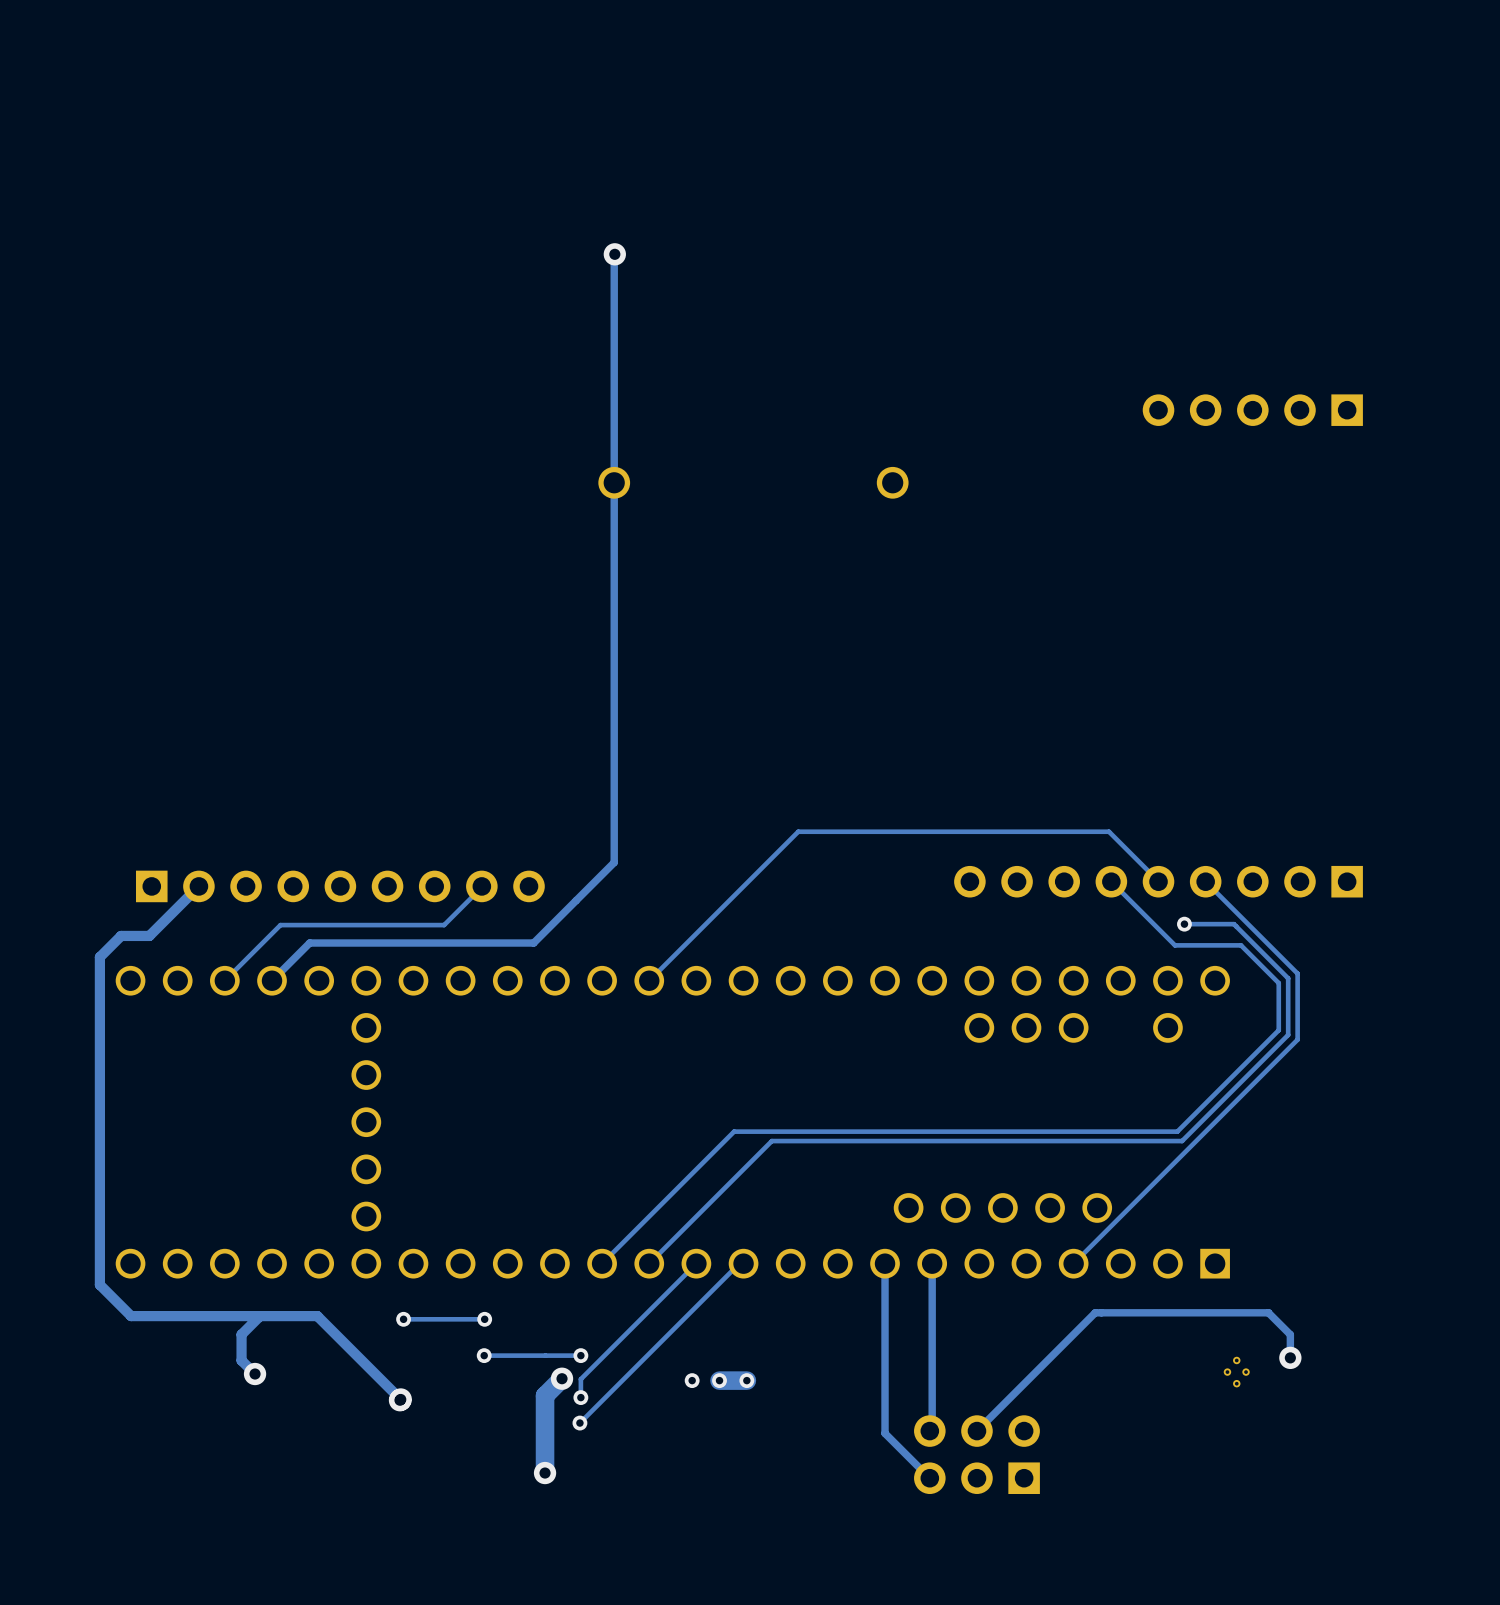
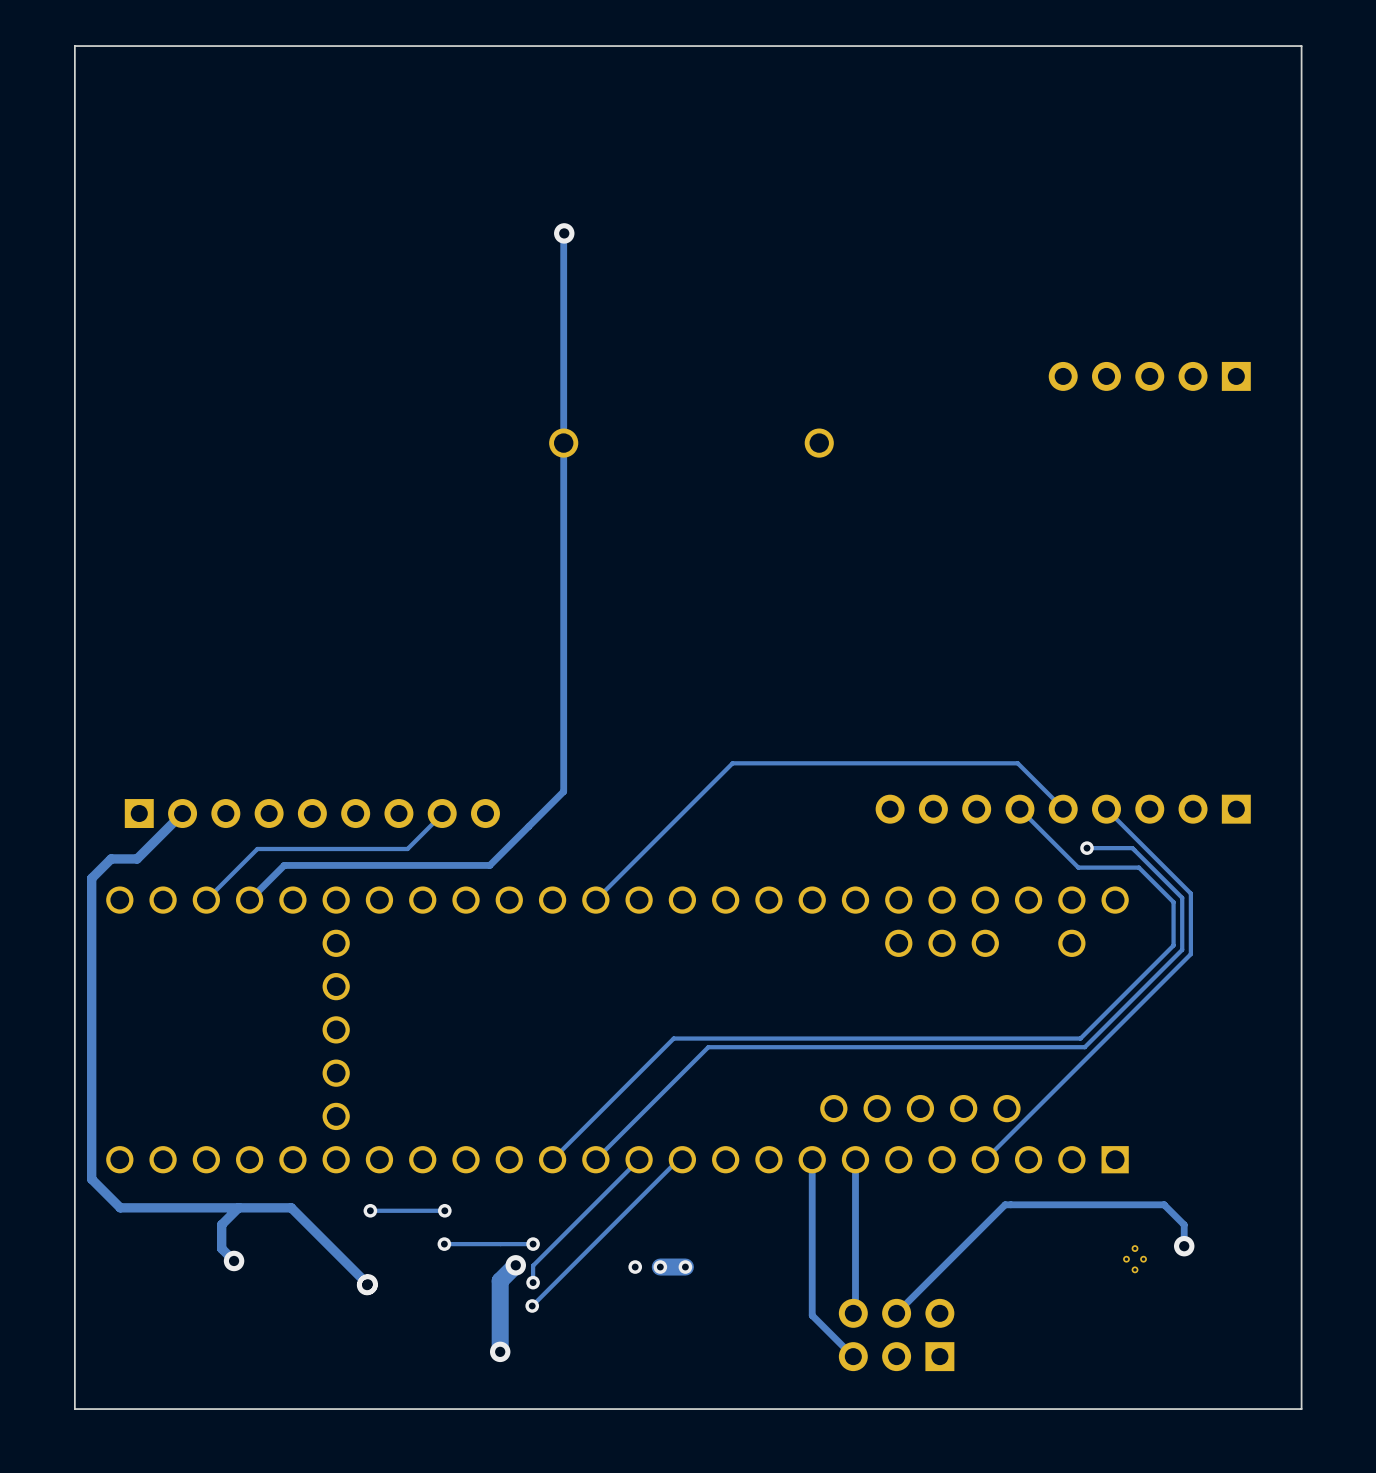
board edge: none -> (1301, 46) (1301, 1409) (74, 1409) (74, 46) (1301, 46)

